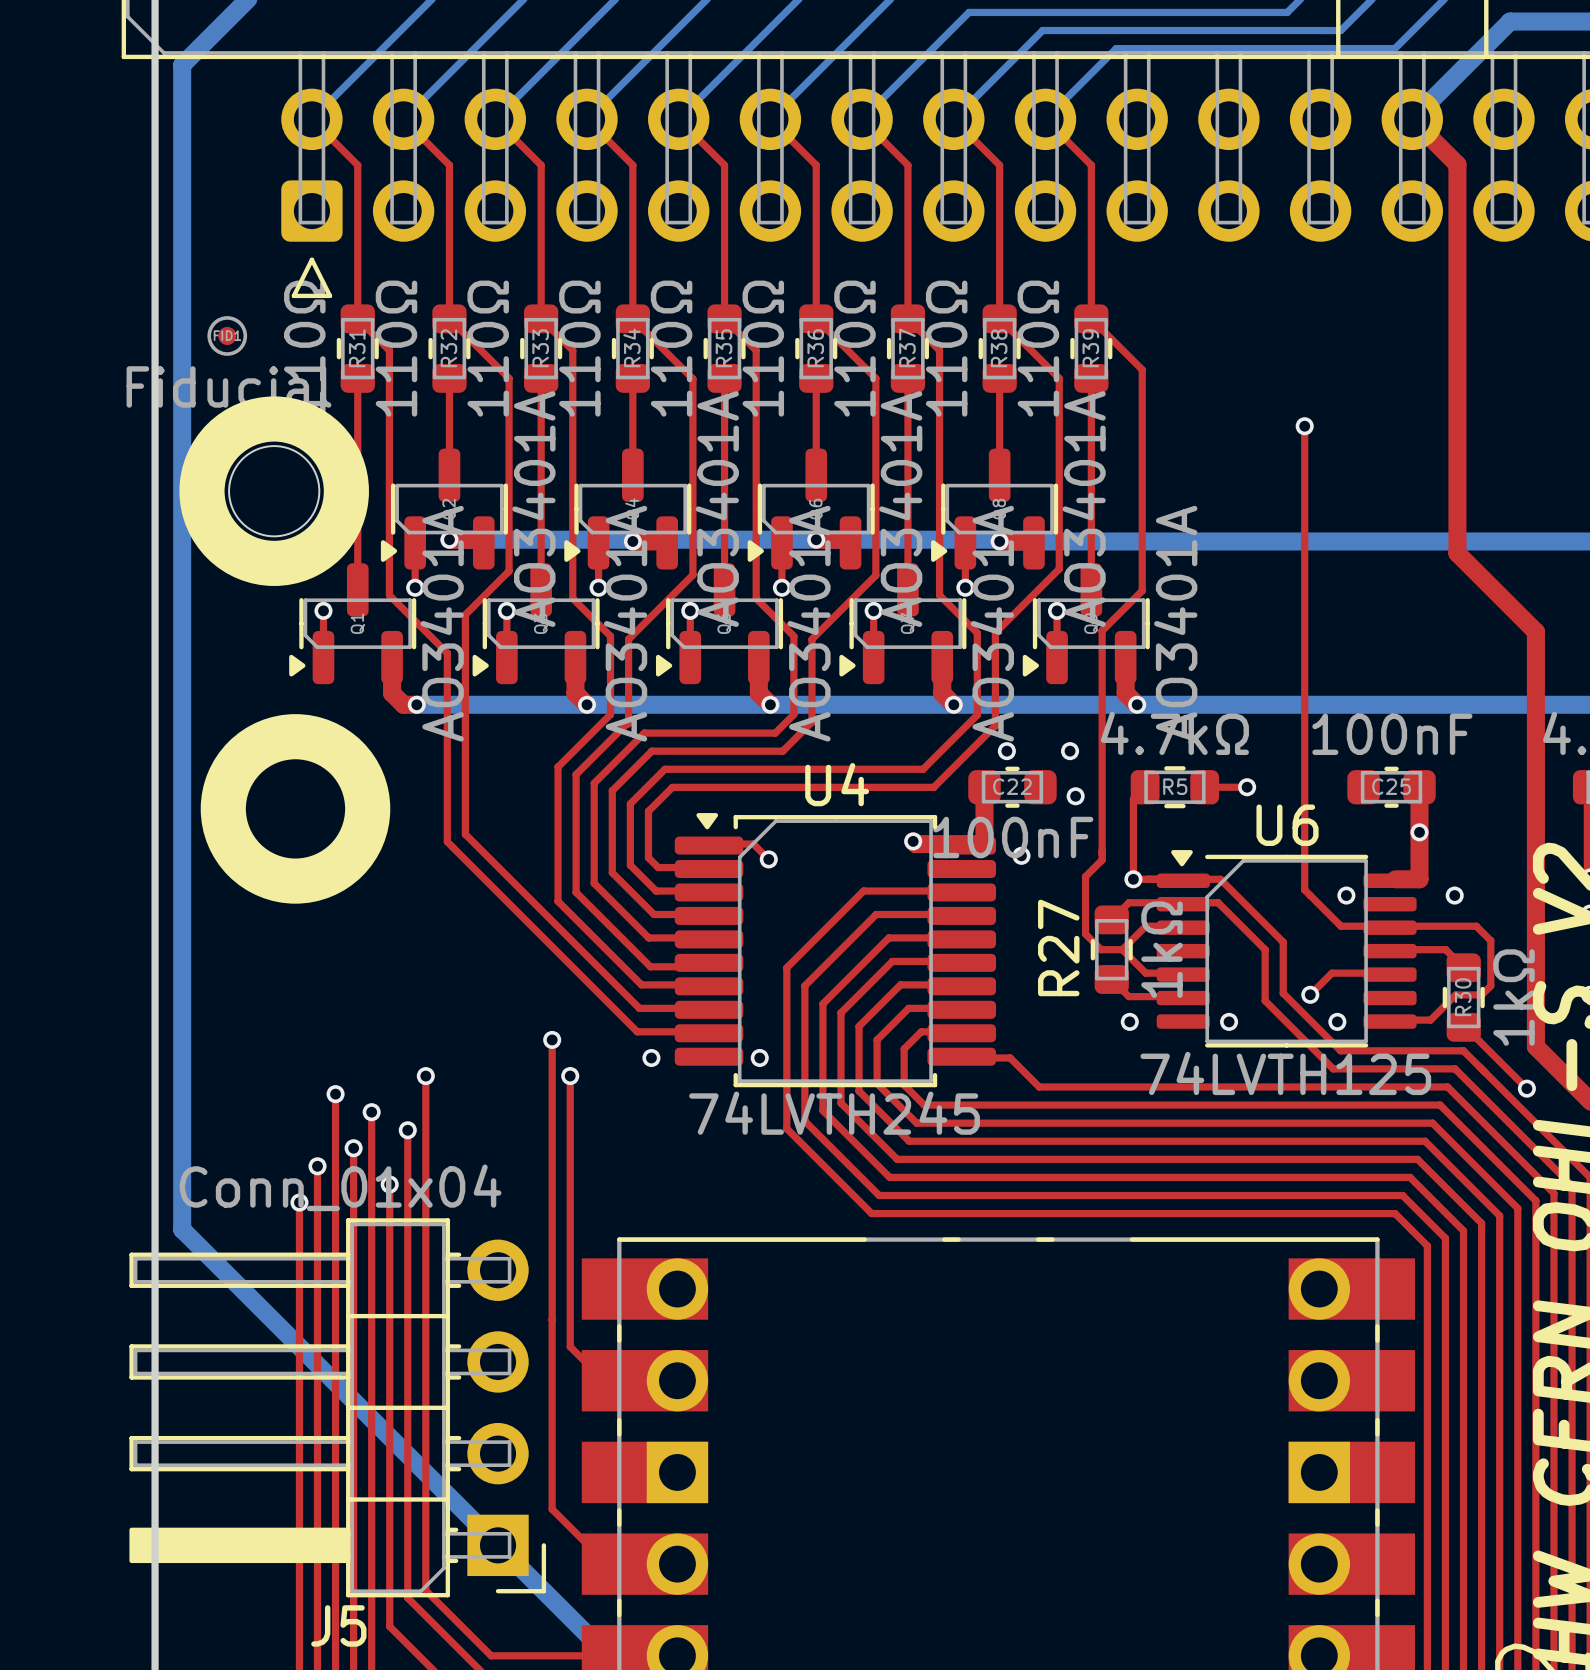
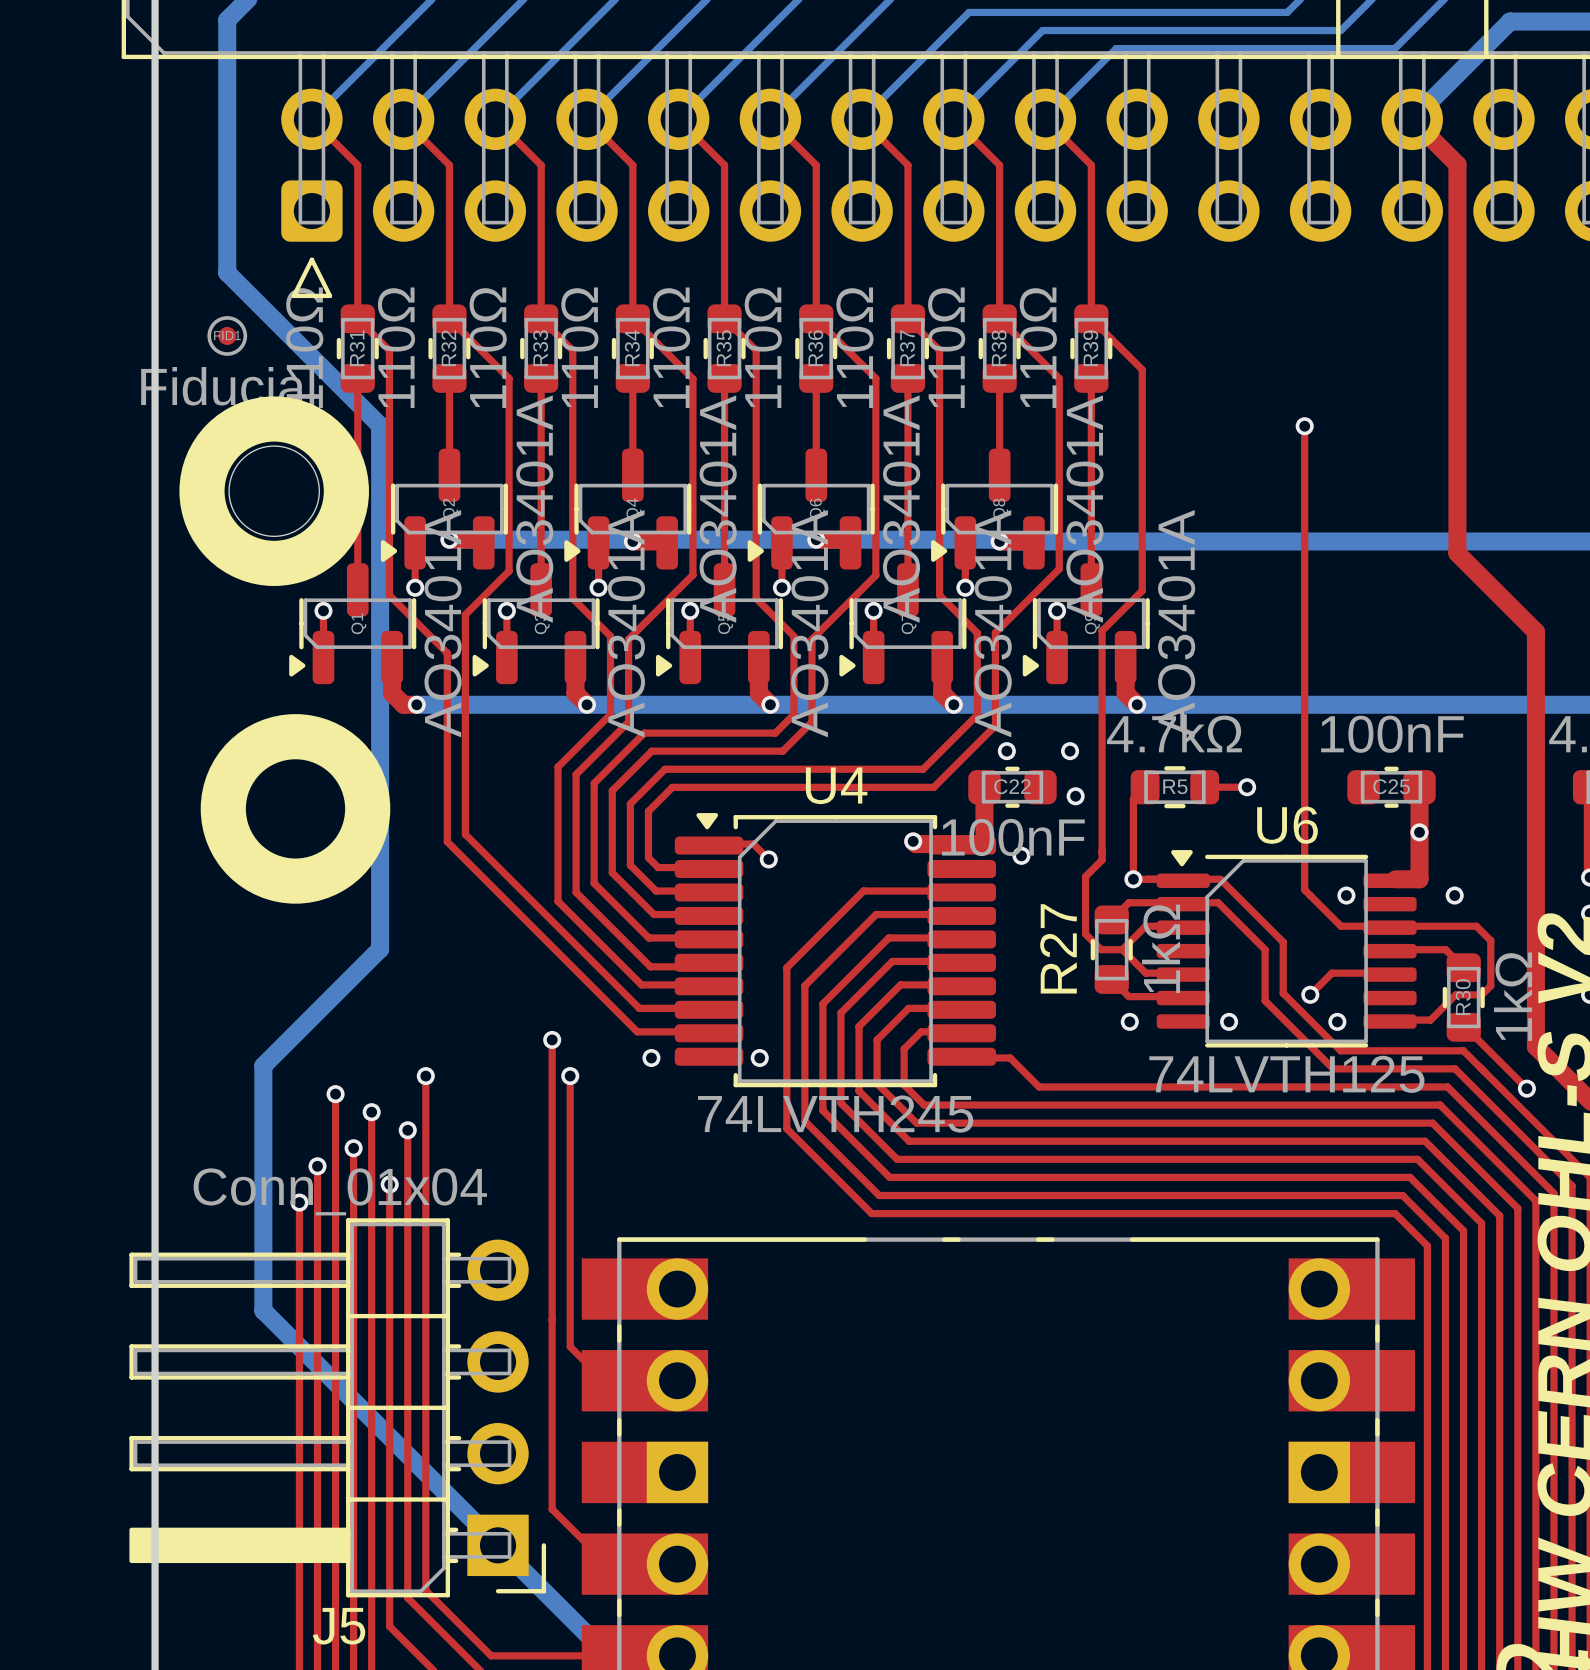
bottom track: (227, 20) (182, 65) (182, 1229) (263, 1310) -> (227, 20) (227, 272) (380, 425) (380, 949) (263, 1065) (263, 1310)

